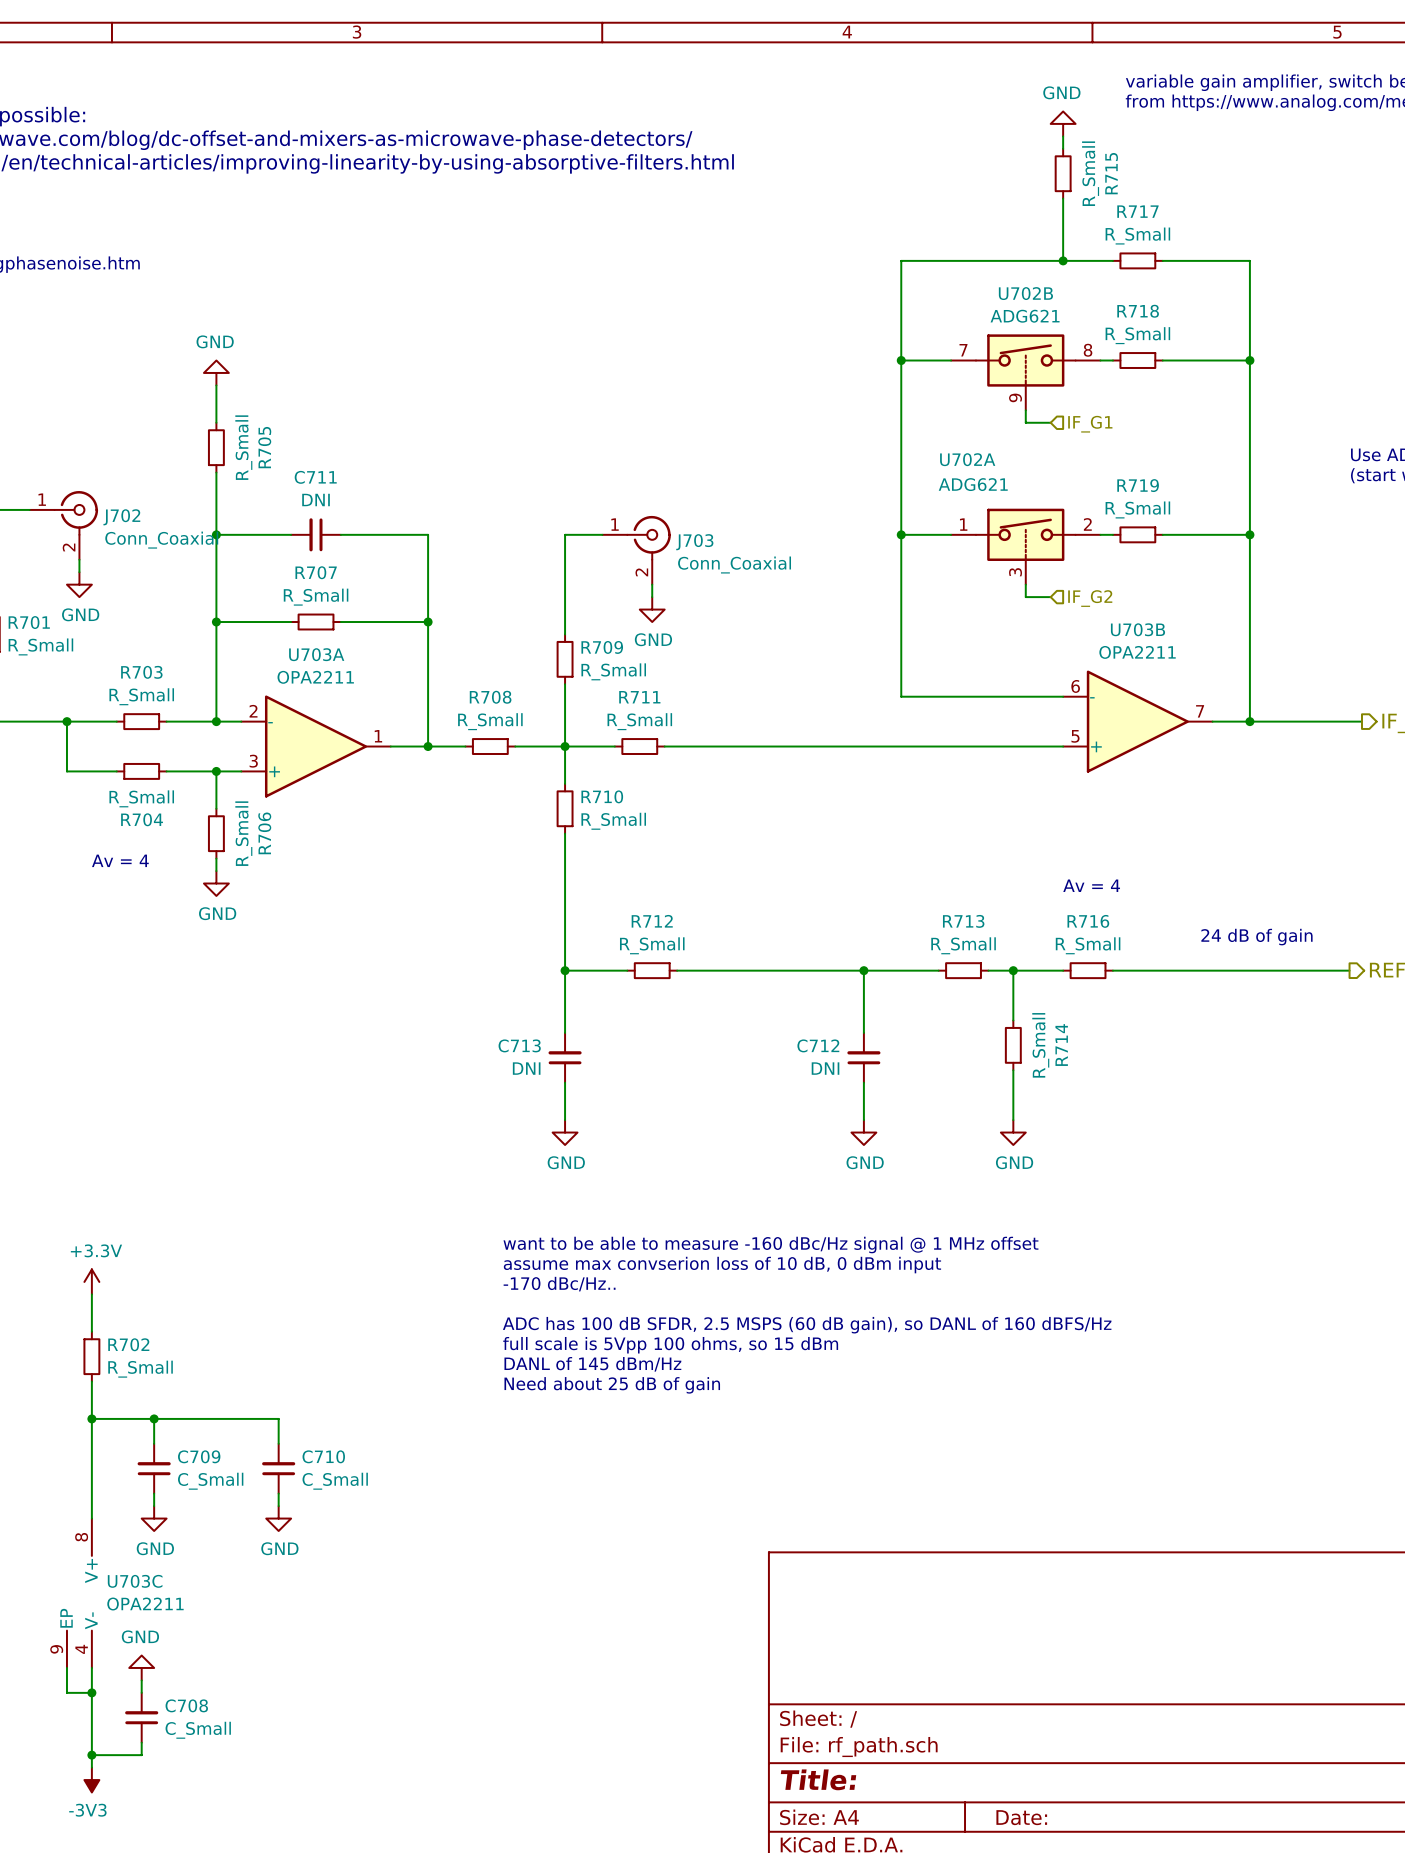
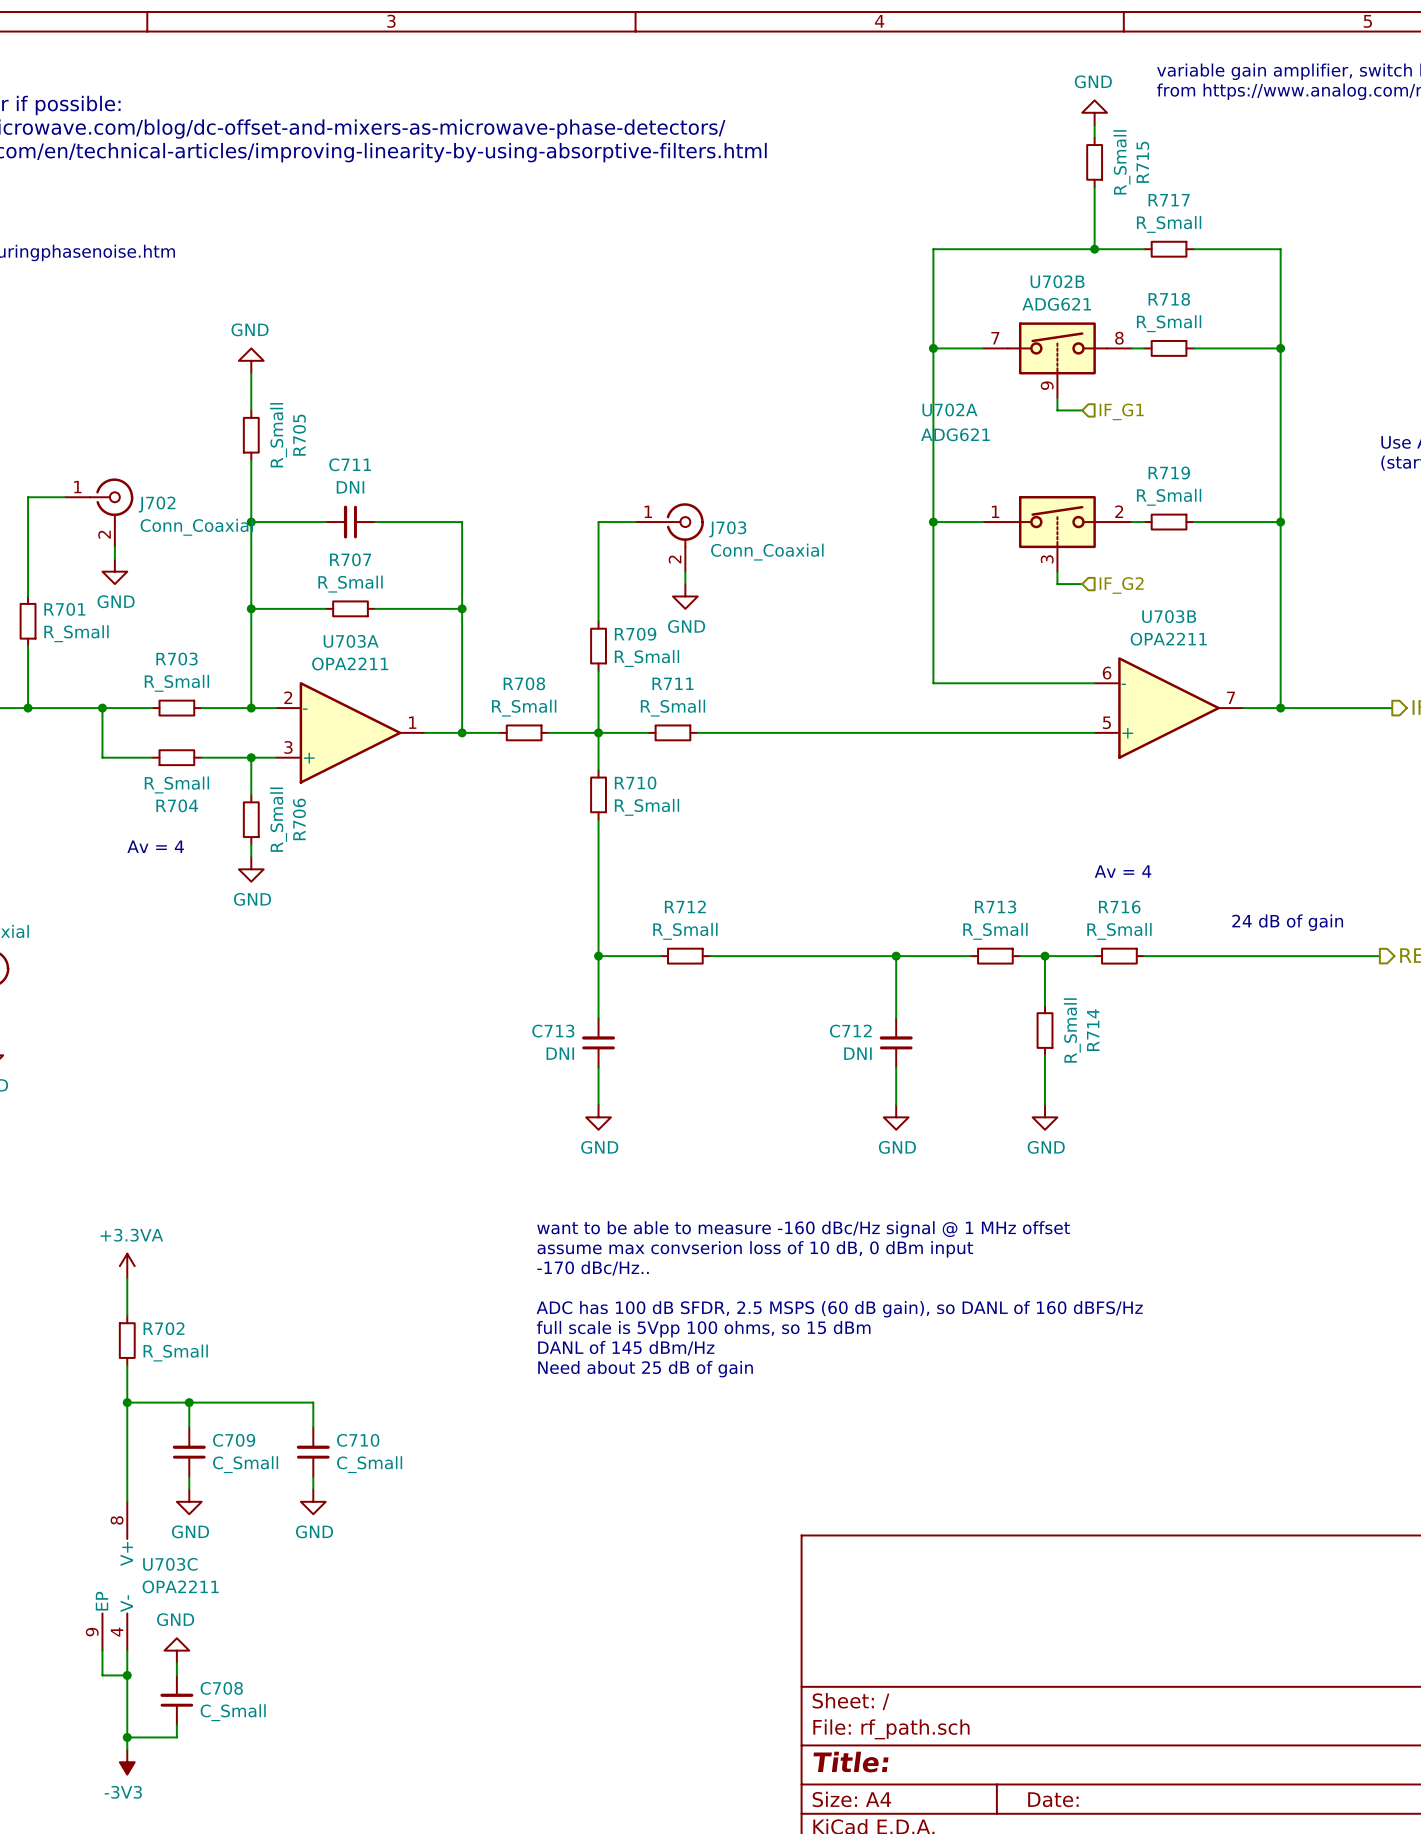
U702A name position: U702A (967, 459) -> U702A (949, 409)
U702A value position: ADG621 (973, 484) -> ADG621 (955, 434)
power symbol: +3.3V (91, 1281) -> +3.3VA (127, 1266)

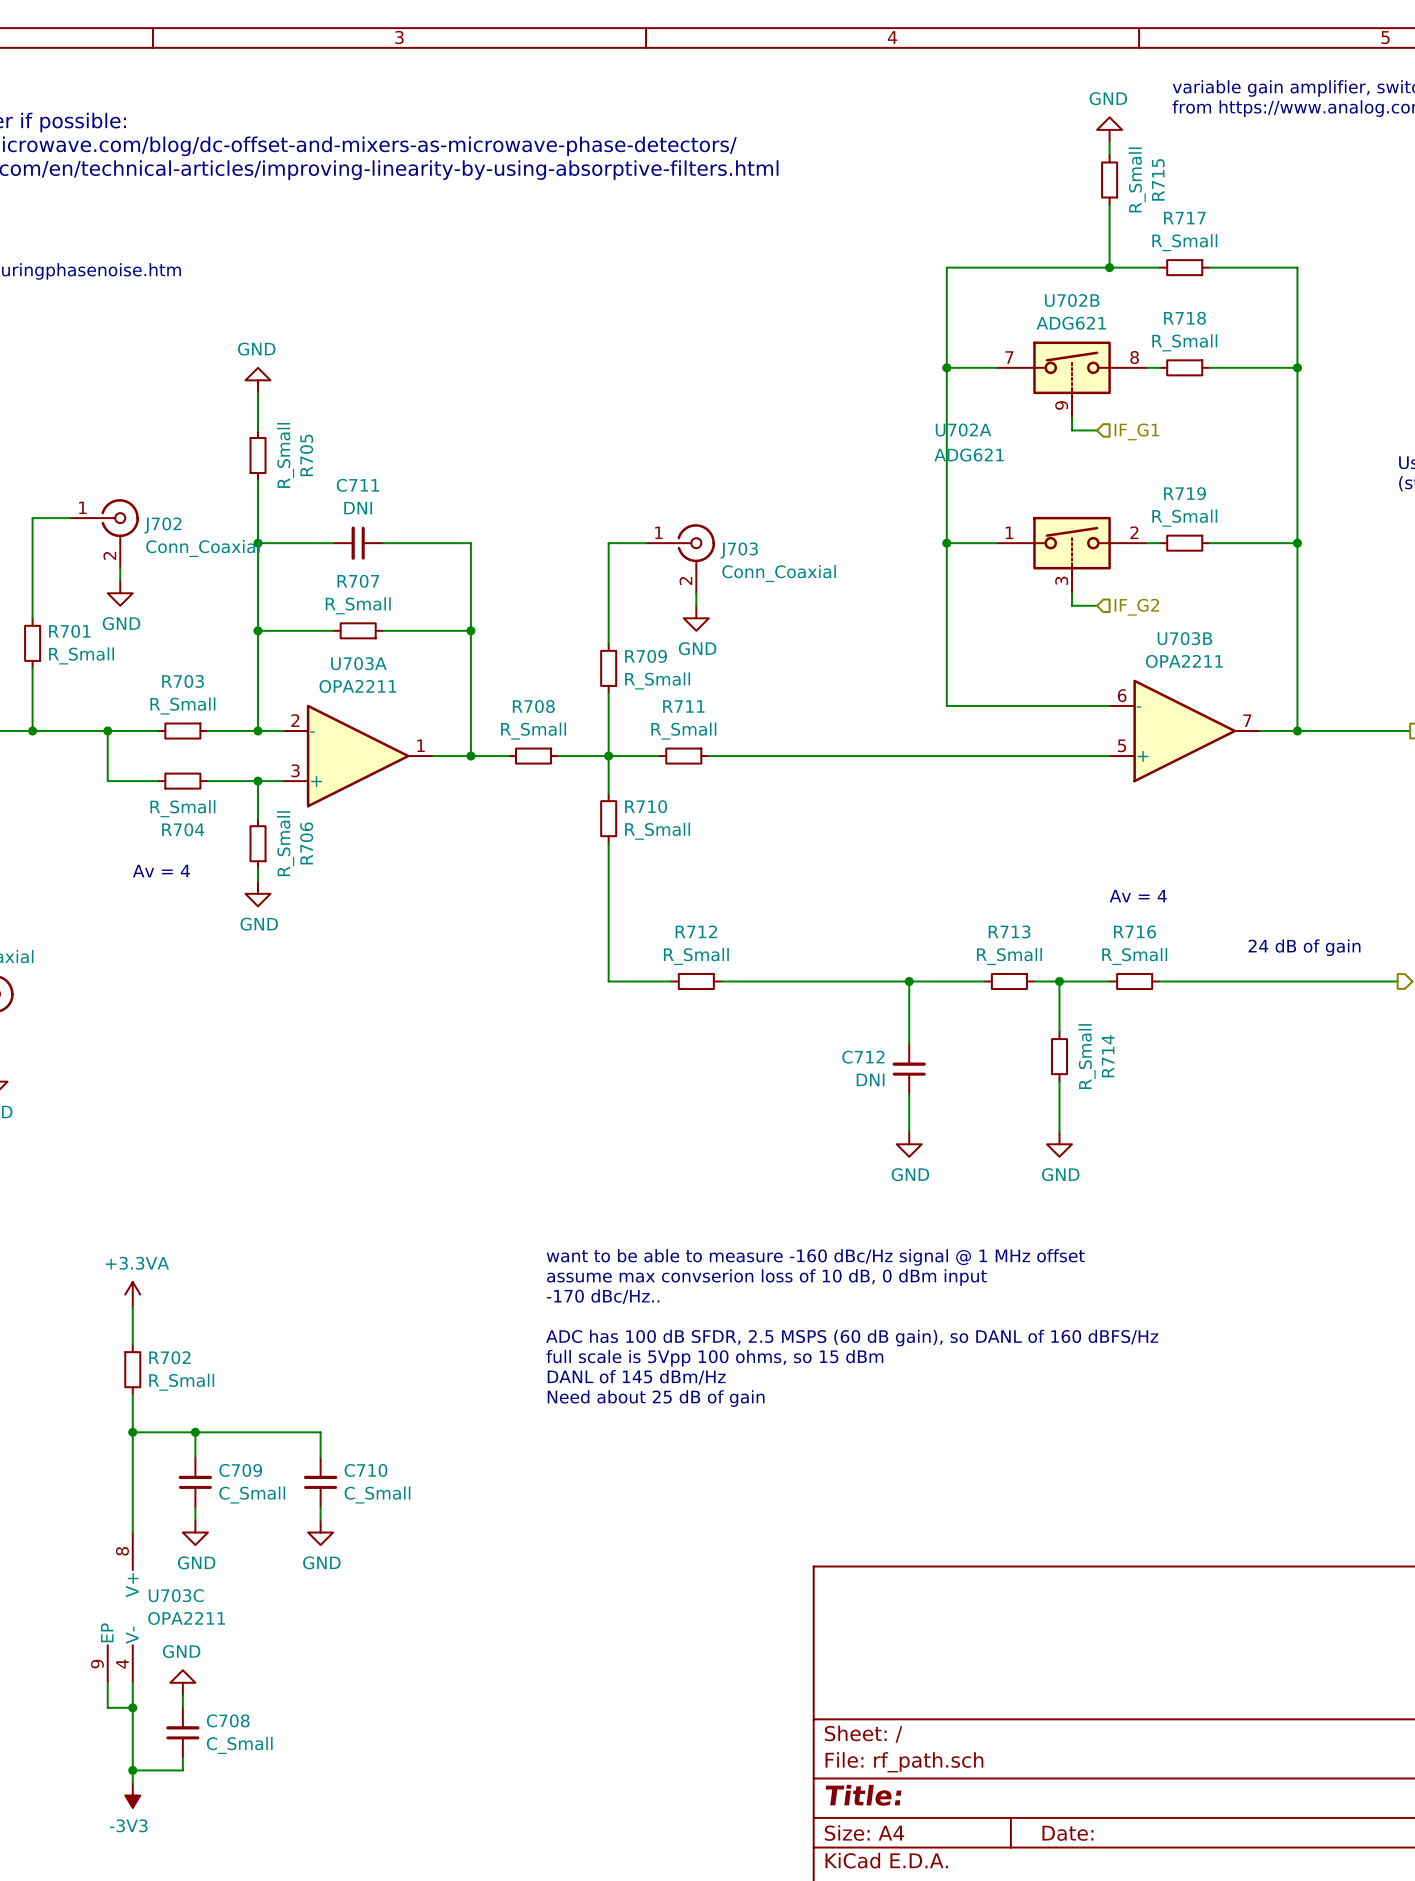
wire: (598, 956) (598, 1018) -> none
junction: (598, 956) -> none
C713: DNI (598, 1042) -> none
wire: (598, 1067) (598, 1104) -> none
power symbol: GND (598, 1117) -> none

